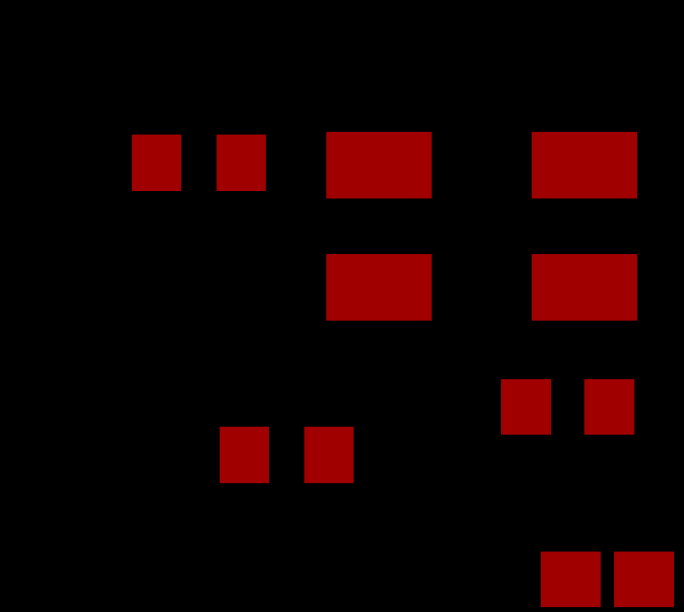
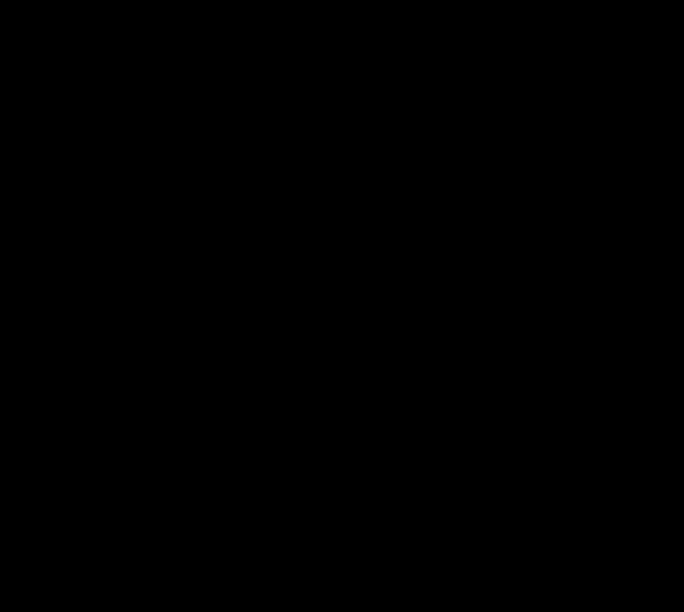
part: (198, 162) -> none
part: (481, 226) -> none
part: (567, 406) -> none
part: (286, 454) -> none
part: (607, 579) -> none

